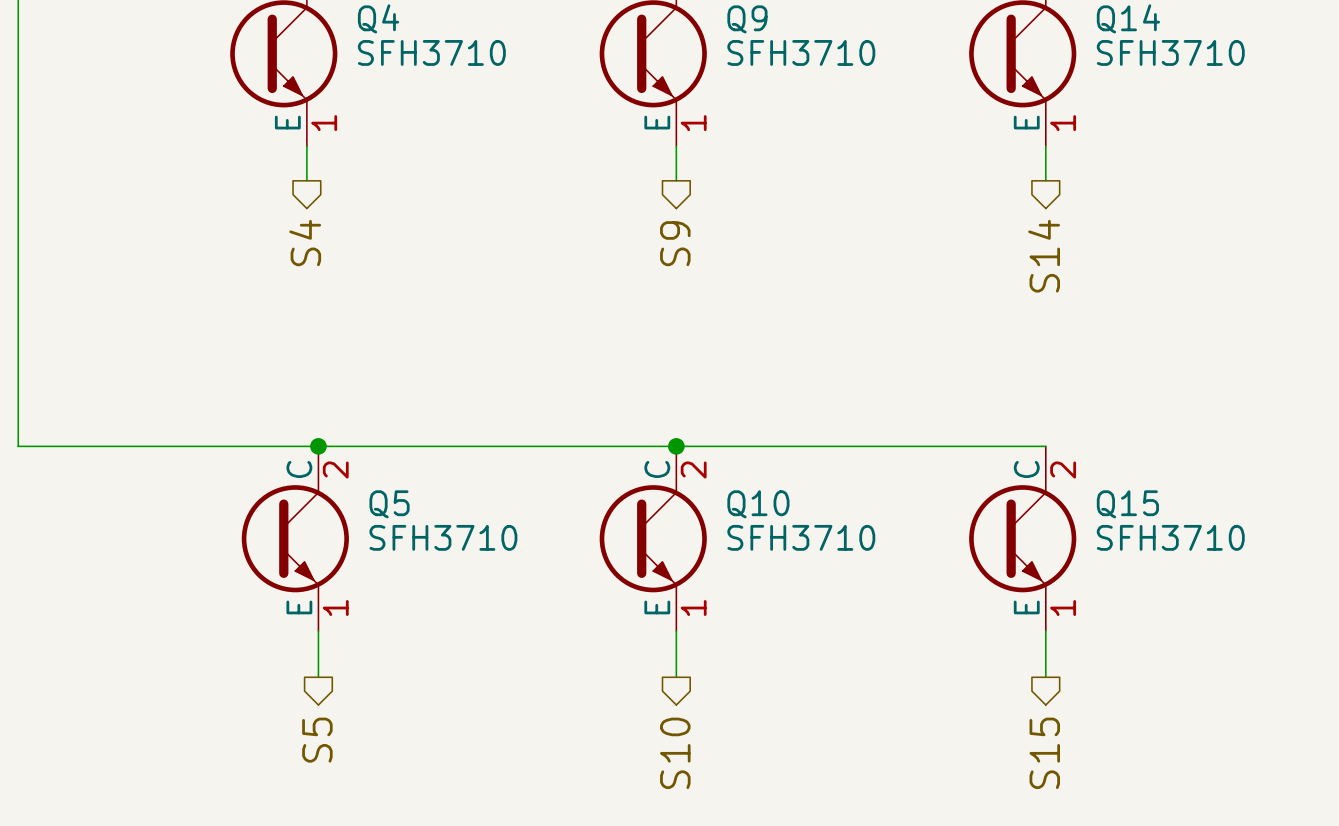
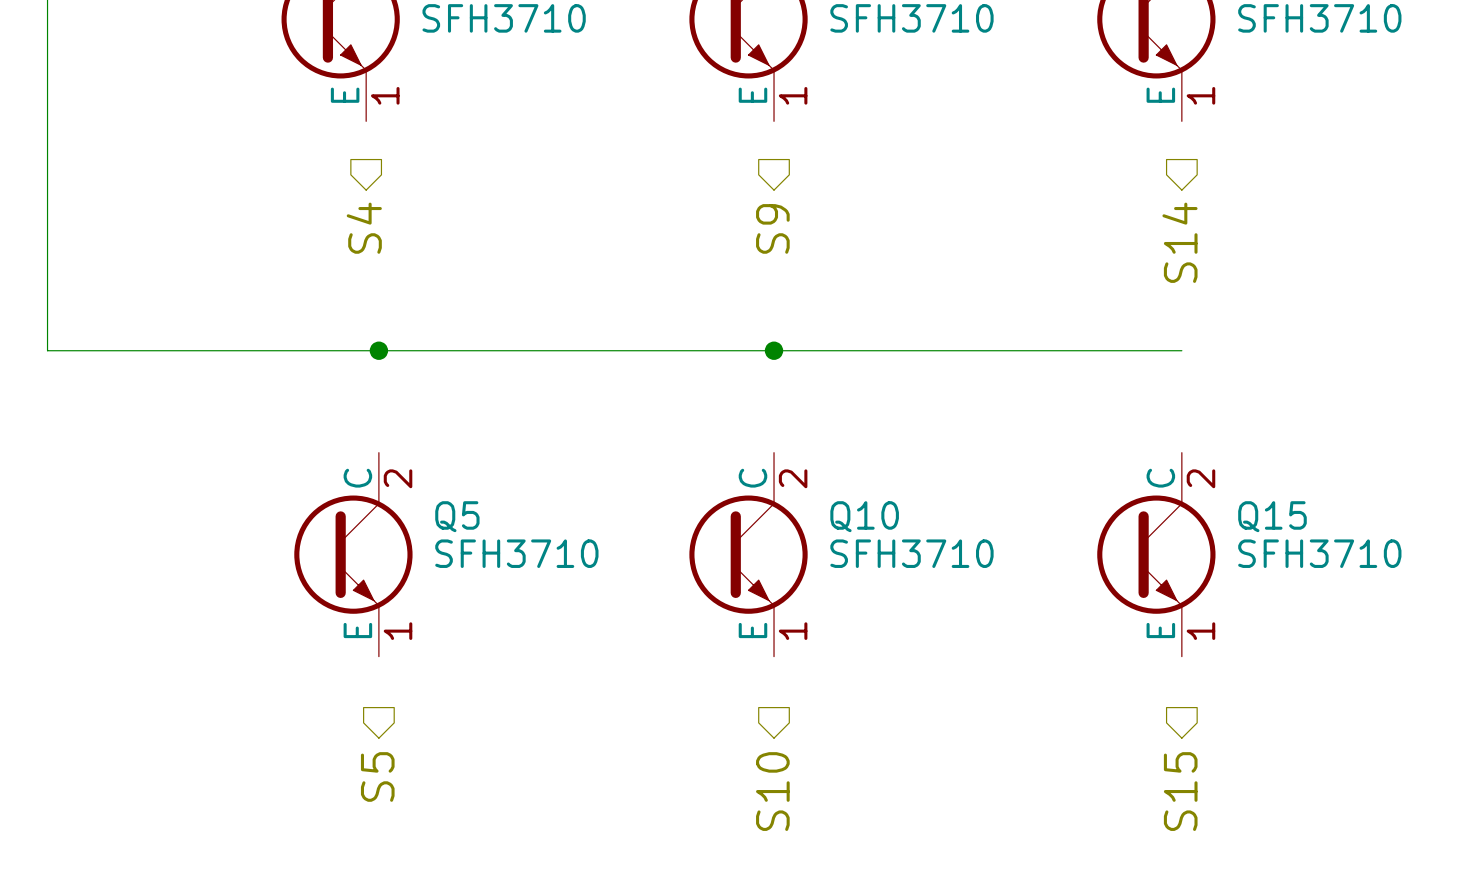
wire: (306, 146) (306, 180) -> none
wire: (676, 146) (676, 180) -> none
wire: (1045, 146) (1045, 180) -> none
wire: (18, 354) (18, 446) (1045, 446) -> (47, 350) (1181, 350)
junction position: (318, 446) -> (378, 350)
junction position: (676, 446) -> (774, 350)
wire: (318, 631) (318, 677) -> none
wire: (676, 631) (676, 677) -> none
wire: (1045, 631) (1045, 677) -> none

